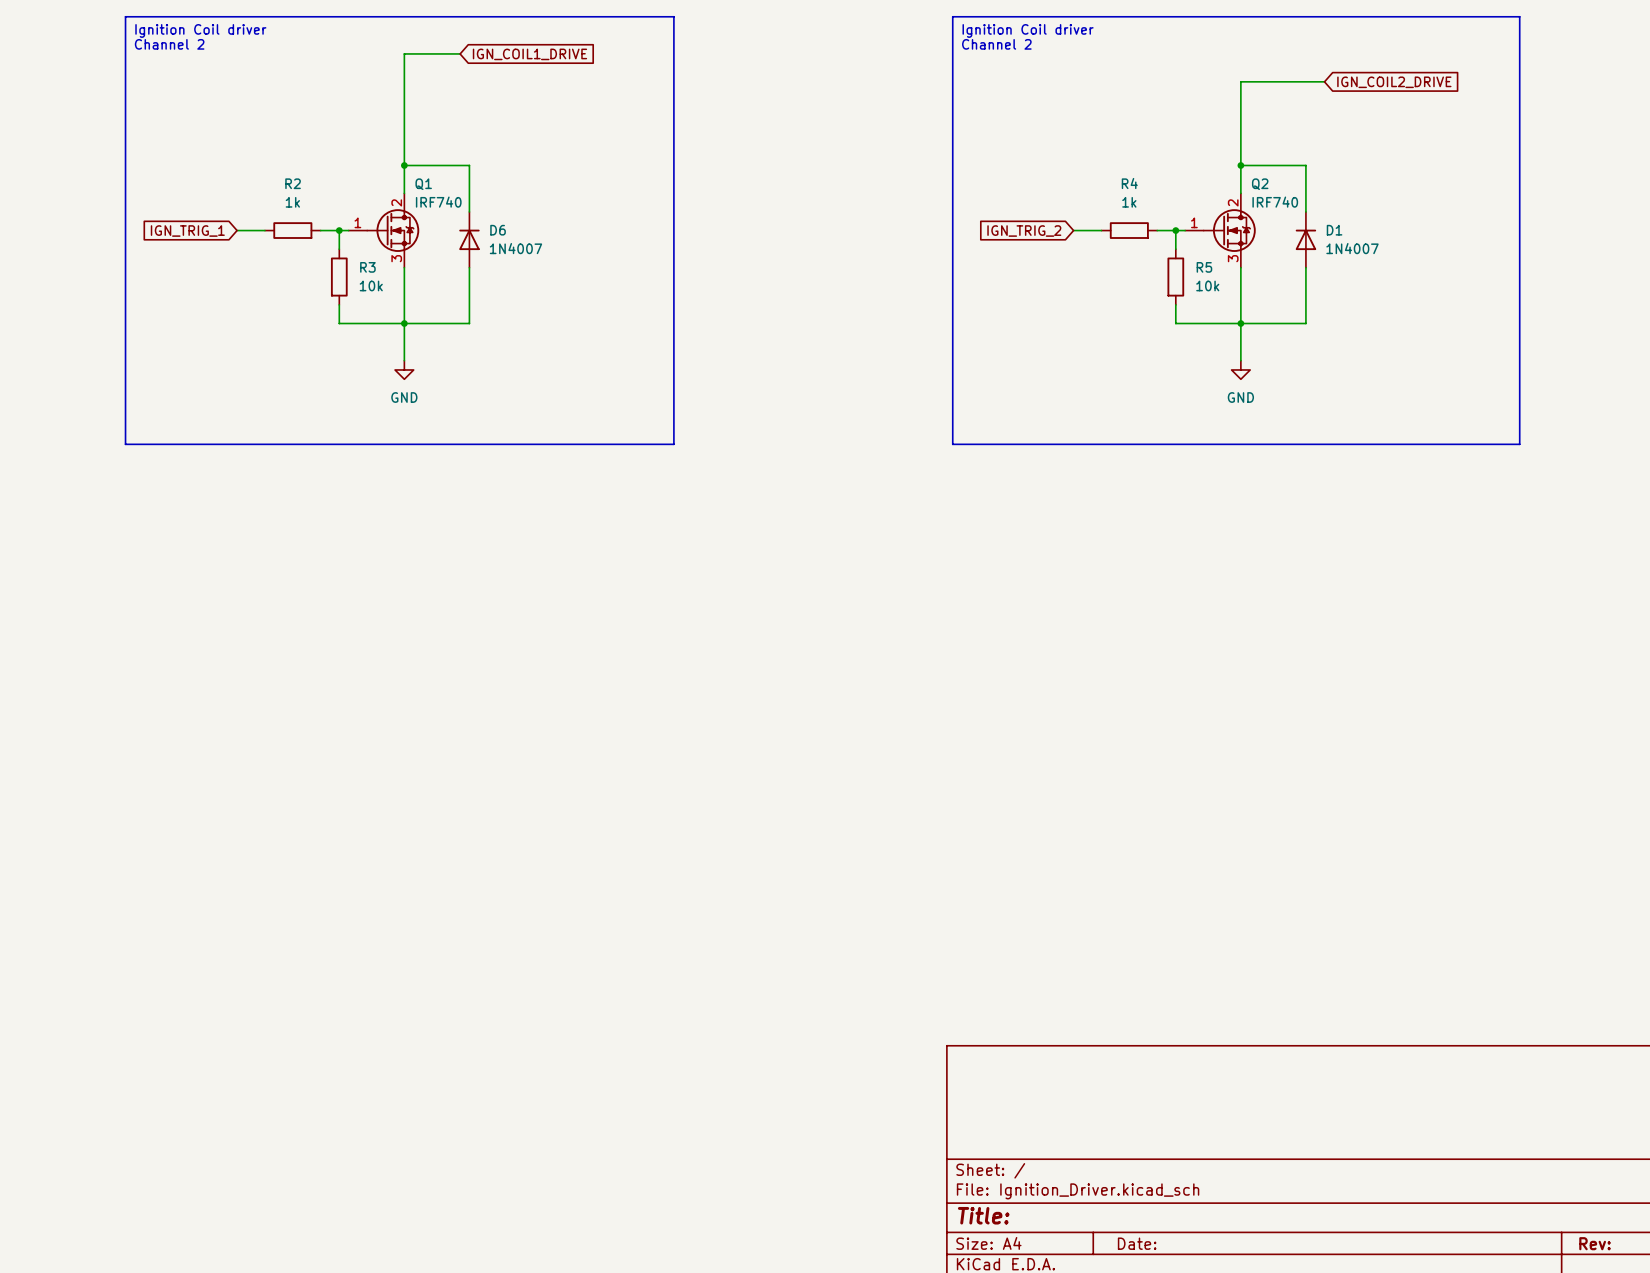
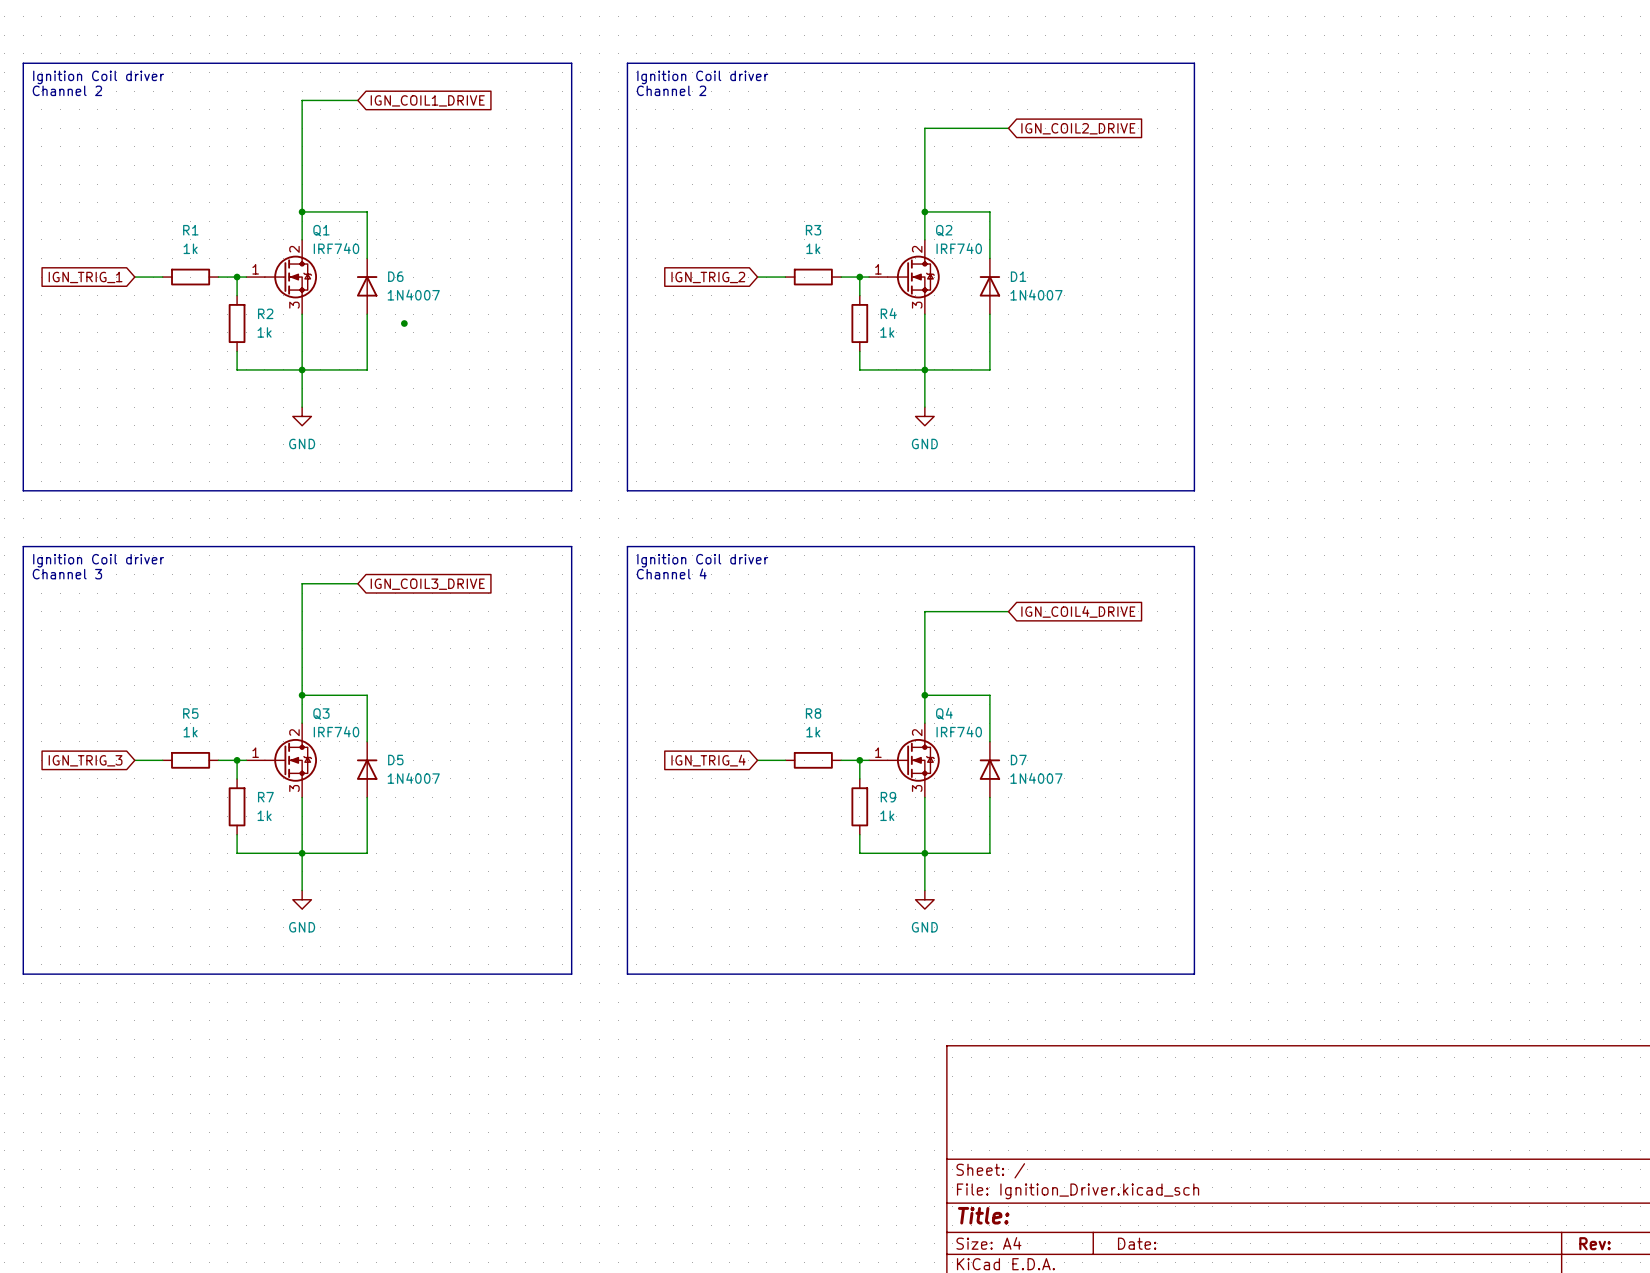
line: (125, 16) (673, 16) (673, 444) (125, 444) (125, 16) -> (23, 63) (571, 63) (571, 490) (23, 490) (23, 63)
line: (952, 16) (1519, 16) (1519, 444) (952, 444) (952, 16) -> none
text position: Ignition Coil driver (200, 30) -> Ignition Coil driver (98, 77)
text: Ignition Coil driver (1028, 30) -> none
text position: Channel 2 (169, 44) -> Channel 2 (67, 90)
text: Channel 2 (996, 44) -> none
wire: (460, 53) (404, 53) (404, 193) -> (357, 100) (302, 100) (302, 239)
global label position: IGN_COIL1_DRIVE (529, 54) -> IGN_COIL1_DRIVE (427, 100)
line: none -> (627, 63) (1194, 63) (1194, 490) (627, 490) (627, 63)
text: none -> Ignition Coil driver (702, 77)
wire: (1324, 81) (1240, 81) (1240, 193) -> none
global label: IGN_COIL2_DRIVE (1394, 82) -> none
text: none -> Channel 2 (671, 90)
wire: none -> (1008, 128) (924, 128) (924, 239)
global label: none -> IGN_COIL2_DRIVE (1078, 128)
wire: (404, 165) (469, 165) (469, 211) -> (302, 211) (367, 211) (367, 258)
junction: (404, 165) -> none
wire: (1240, 165) (1305, 165) (1305, 211) -> none
junction: (1240, 165) -> none
R2 name position: R2 (293, 183) -> R2 (265, 313)
R4 name position: R4 (1129, 183) -> R4 (888, 313)
wire: none -> (924, 211) (989, 211) (989, 258)
junction: none -> (924, 211)
wire: (237, 230) (264, 230) -> (134, 277) (162, 277)
R2 rotation: 0° (292, 230) -> 90° clockwise (237, 323)
R2 position: (292, 230) -> (237, 323)
wire: (320, 230) (348, 230) -> (218, 277) (246, 277)
wire: (339, 230) (339, 249) -> (237, 277) (237, 295)
junction position: (339, 230) -> (302, 211)
Q1 position: (383, 230) -> (281, 277)
wire: (1073, 230) (1101, 230) -> none
R4 rotation: 0° (1129, 230) -> 90° clockwise (859, 323)
R4 position: (1129, 230) -> (859, 323)
wire: (1157, 230) (1185, 230) -> none
wire: (1175, 230) (1175, 249) -> none
junction: (1175, 230) -> none
Q2 position: (1220, 230) -> (904, 277)
global label position: IGN_TRIG_1 (187, 231) -> IGN_TRIG_1 (85, 277)
global label: IGN_TRIG_2 (1024, 231) -> none
D6 position: (469, 239) -> (367, 286)
D1 position: (1305, 239) -> (989, 286)
R3 name position: R3 (367, 267) -> R3 (813, 230)
wire: (404, 267) (404, 360) -> (302, 314) (302, 407)
wire: (469, 267) (469, 323) (339, 323) (339, 304) -> (367, 314) (367, 369) (237, 369) (237, 351)
R5 name position: R5 (1204, 267) -> R5 (190, 713)
wire: (1240, 267) (1240, 360) -> none
wire: (1305, 267) (1305, 323) (1175, 323) (1175, 304) -> none
R1: none -> 1k (190, 277)
junction: none -> (237, 277)
R3 rotation: 0° (339, 277) -> 90° clockwise (813, 277)
R3 position: (339, 277) -> (813, 277)
global label: none -> IGN_TRIG_2 (708, 277)
wire: none -> (757, 277) (785, 277)
wire: none -> (841, 277) (869, 277)
wire: none -> (859, 277) (859, 295)
junction: none -> (859, 277)
R5 rotation: 0° (1175, 277) -> 90° clockwise (190, 760)
R5 position: (1175, 277) -> (190, 760)
R3 value: 10k (371, 285) -> 1k (813, 248)
R5 value: 10k (1207, 285) -> 1k (190, 732)
wire: none -> (924, 314) (924, 407)
wire: none -> (989, 314) (989, 369) (859, 369) (859, 351)
junction: (1240, 323) -> none
junction: none -> (302, 369)
power symbol position: GND (404, 369) -> GND (302, 416)
junction: none -> (924, 369)
power symbol: GND (1240, 369) -> none
power symbol: none -> GND (924, 416)
line: none -> (23, 546) (23, 974) (571, 974) (571, 546) (23, 546)
line: none -> (627, 546) (627, 974) (1194, 974) (1194, 546) (627, 546)
text: none -> Ignition Coil driver (98, 560)
text: none -> Ignition Coil driver (702, 560)
text: none -> Channel 4 (671, 573)
text: none -> Channel 3 (67, 574)
wire: none -> (357, 583) (302, 583) (302, 723)
global label: none -> IGN_COIL3_DRIVE (427, 584)
wire: none -> (1008, 611) (924, 611) (924, 723)
global label: none -> IGN_COIL4_DRIVE (1078, 611)
wire: none -> (302, 695) (367, 695) (367, 741)
junction: none -> (302, 695)
wire: none -> (924, 695) (989, 695) (989, 741)
junction: none -> (924, 695)
global label: none -> IGN_TRIG_3 (85, 760)
wire: none -> (134, 760) (162, 760)
wire: none -> (218, 760) (246, 760)
wire: none -> (237, 760) (237, 778)
junction: none -> (237, 760)
Q3: none -> IRF740 (281, 760)
global label: none -> IGN_TRIG_4 (708, 760)
wire: none -> (757, 760) (785, 760)
R8: none -> 1k (813, 760)
wire: none -> (841, 760) (869, 760)
wire: none -> (859, 760) (859, 778)
junction: none -> (859, 760)
Q4: none -> IRF740 (904, 760)
D5: none -> 1N4007 (367, 769)
D7: none -> 1N4007 (989, 769)
wire: none -> (302, 797) (302, 890)
wire: none -> (367, 797) (367, 853) (237, 853) (237, 834)
wire: none -> (924, 797) (924, 890)
wire: none -> (989, 797) (989, 853) (859, 853) (859, 834)
R7: none -> 1k (237, 806)
R9: none -> 1k (859, 806)
junction: none -> (302, 853)
junction: none -> (924, 853)
power symbol: none -> GND (302, 899)
power symbol: none -> GND (924, 899)

